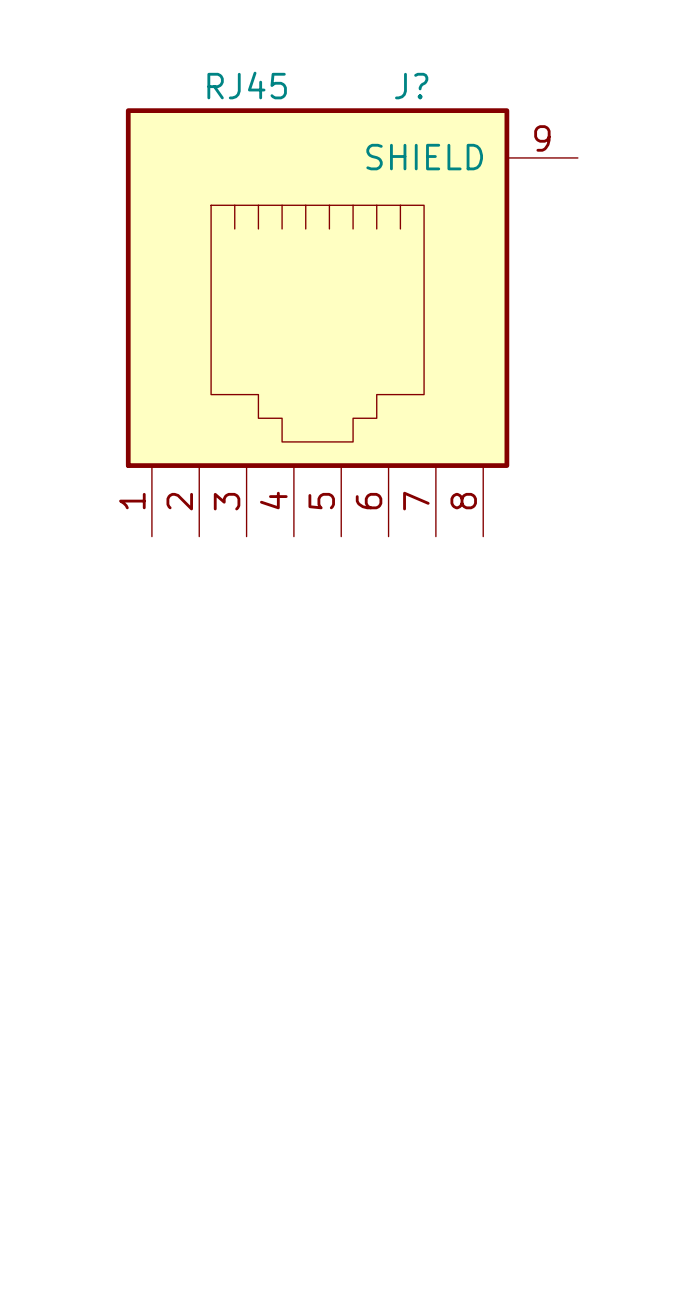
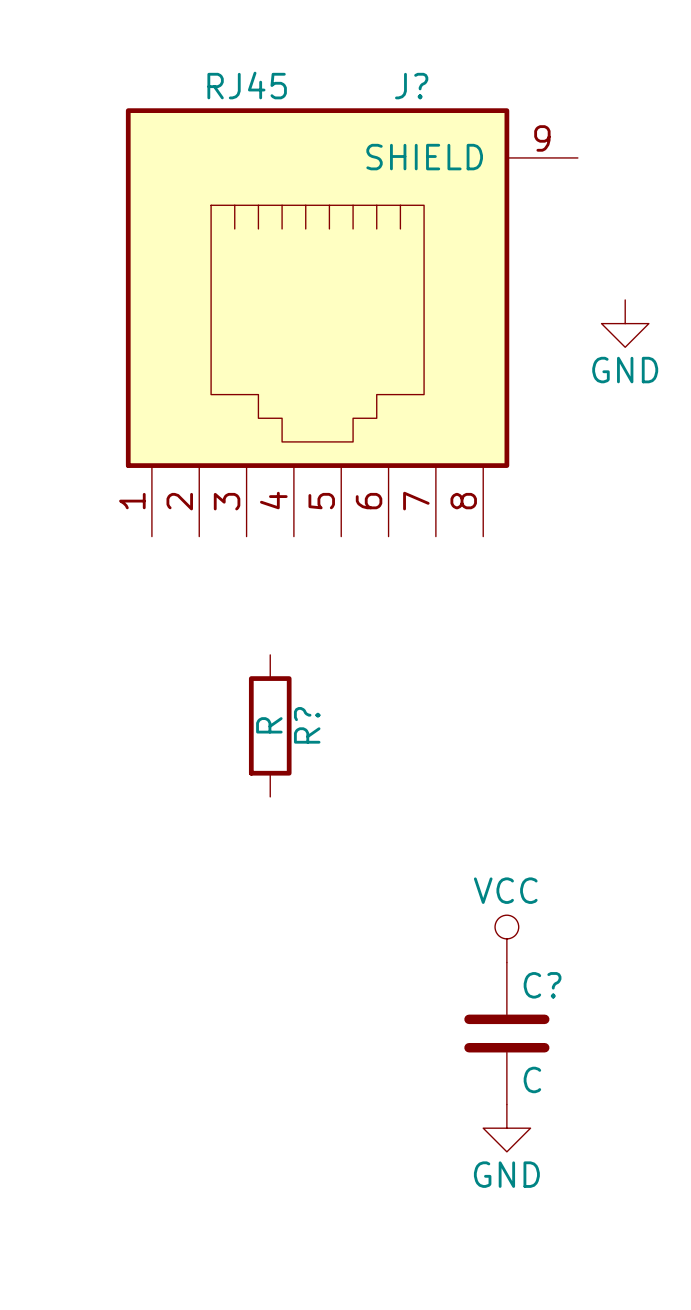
power symbol: none -> GND (625, 323)
R?: none -> R (270, 725)
power symbol: none -> VCC (506, 938)
C?: none -> C (506, 1033)
power symbol: none -> GND (506, 1128)

